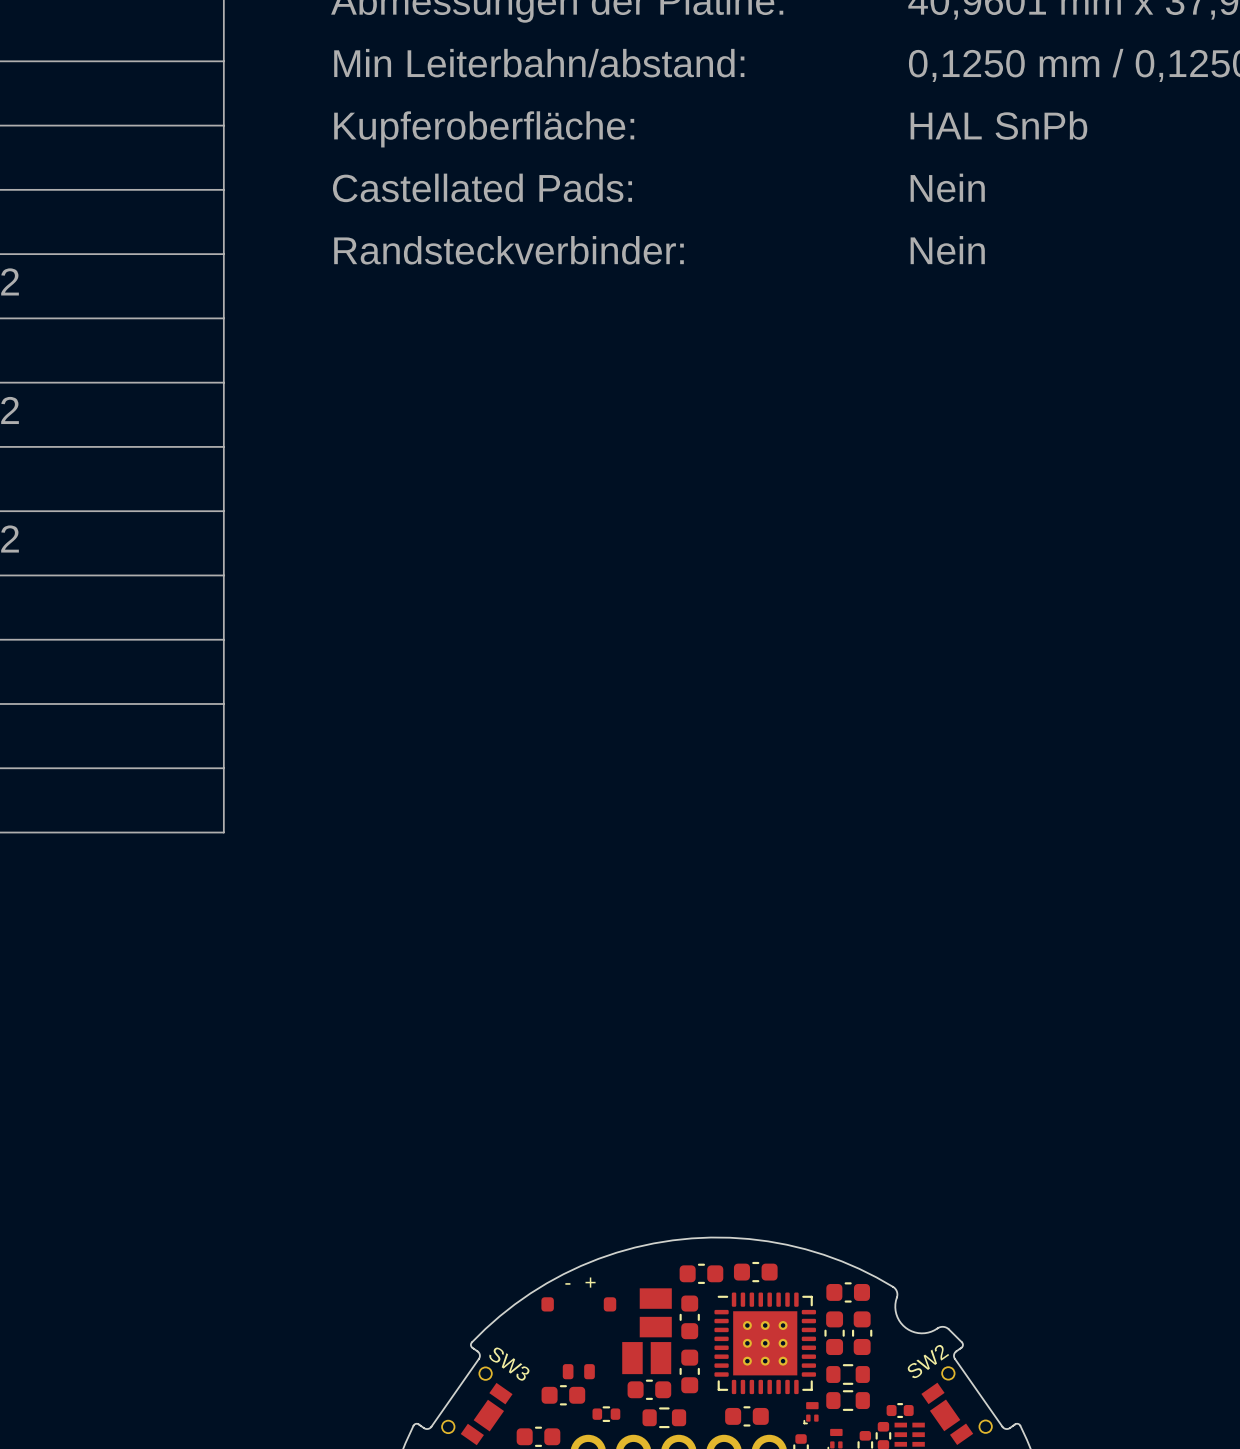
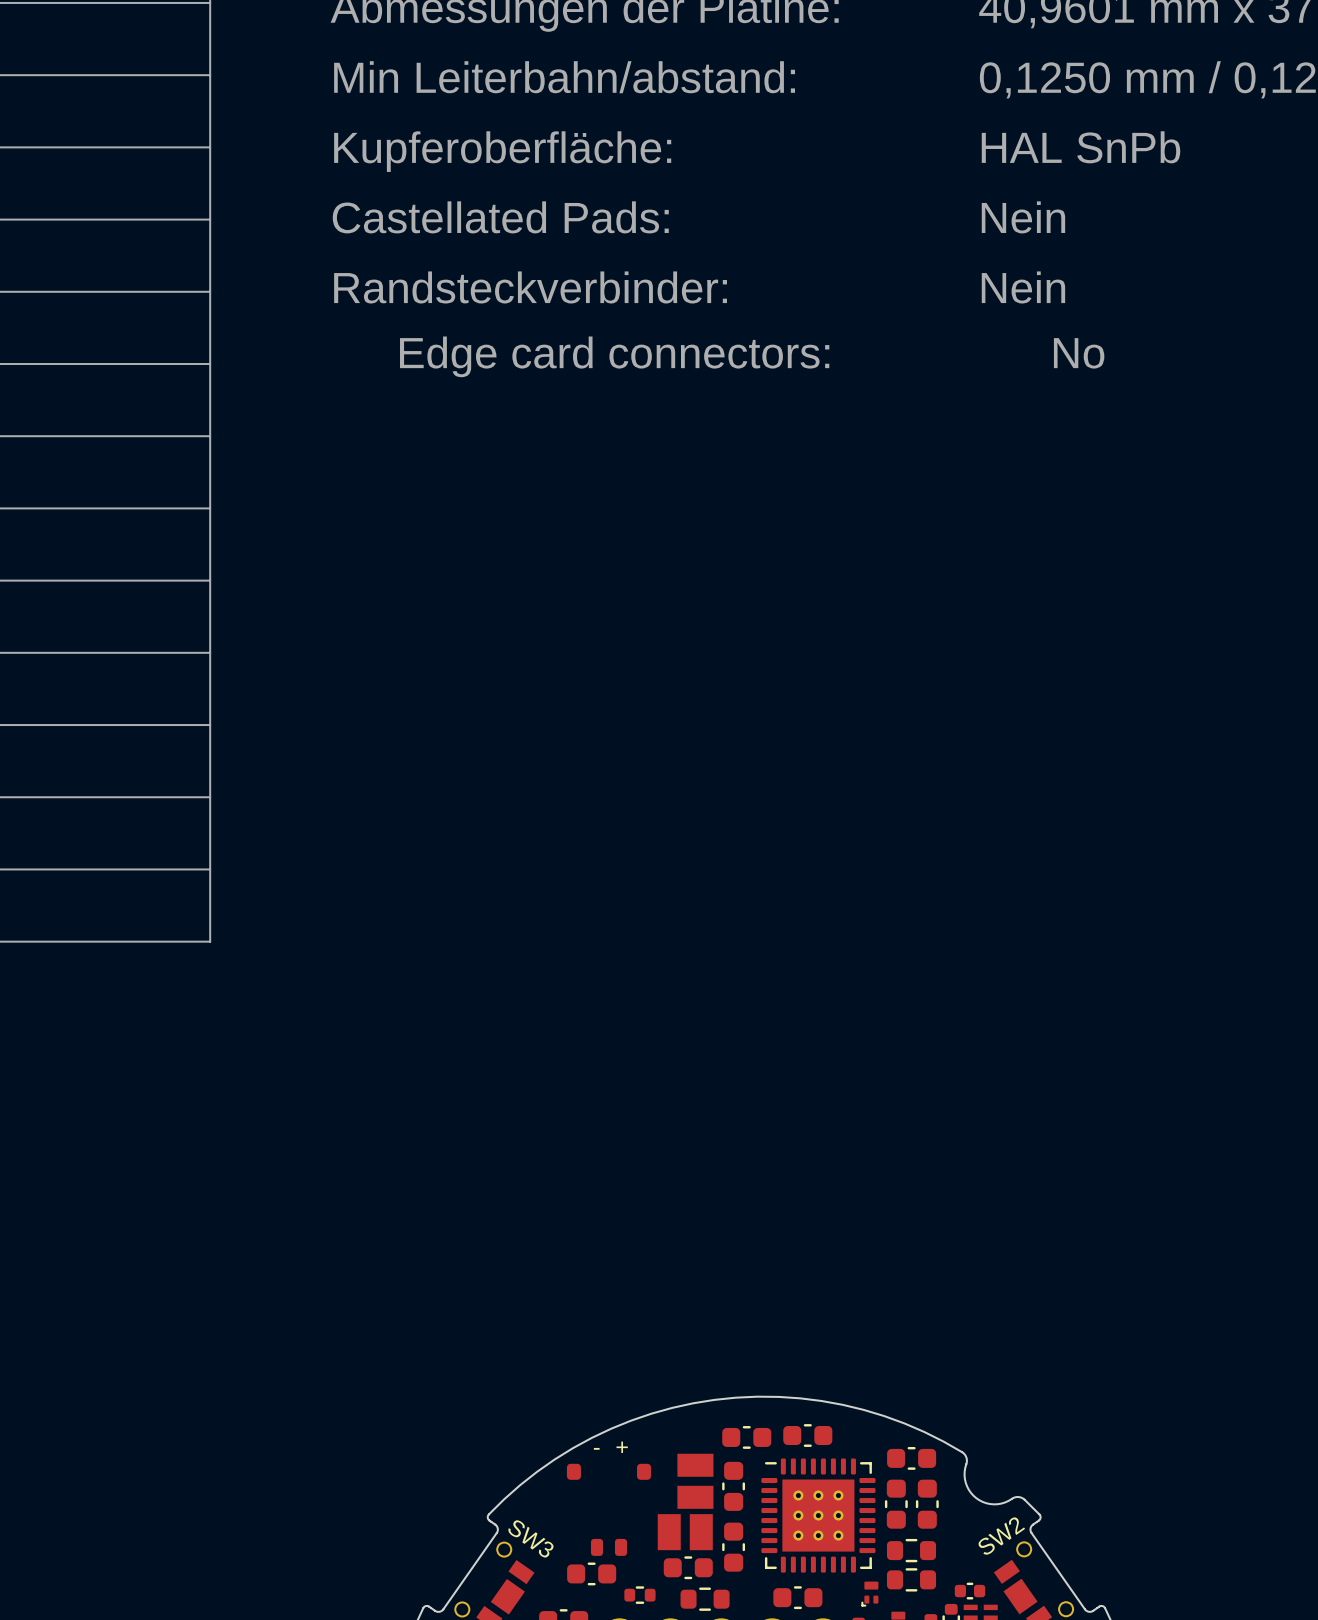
text: none -> No (1079, 353)
text: none -> Edge card connectors: (614, 356)

